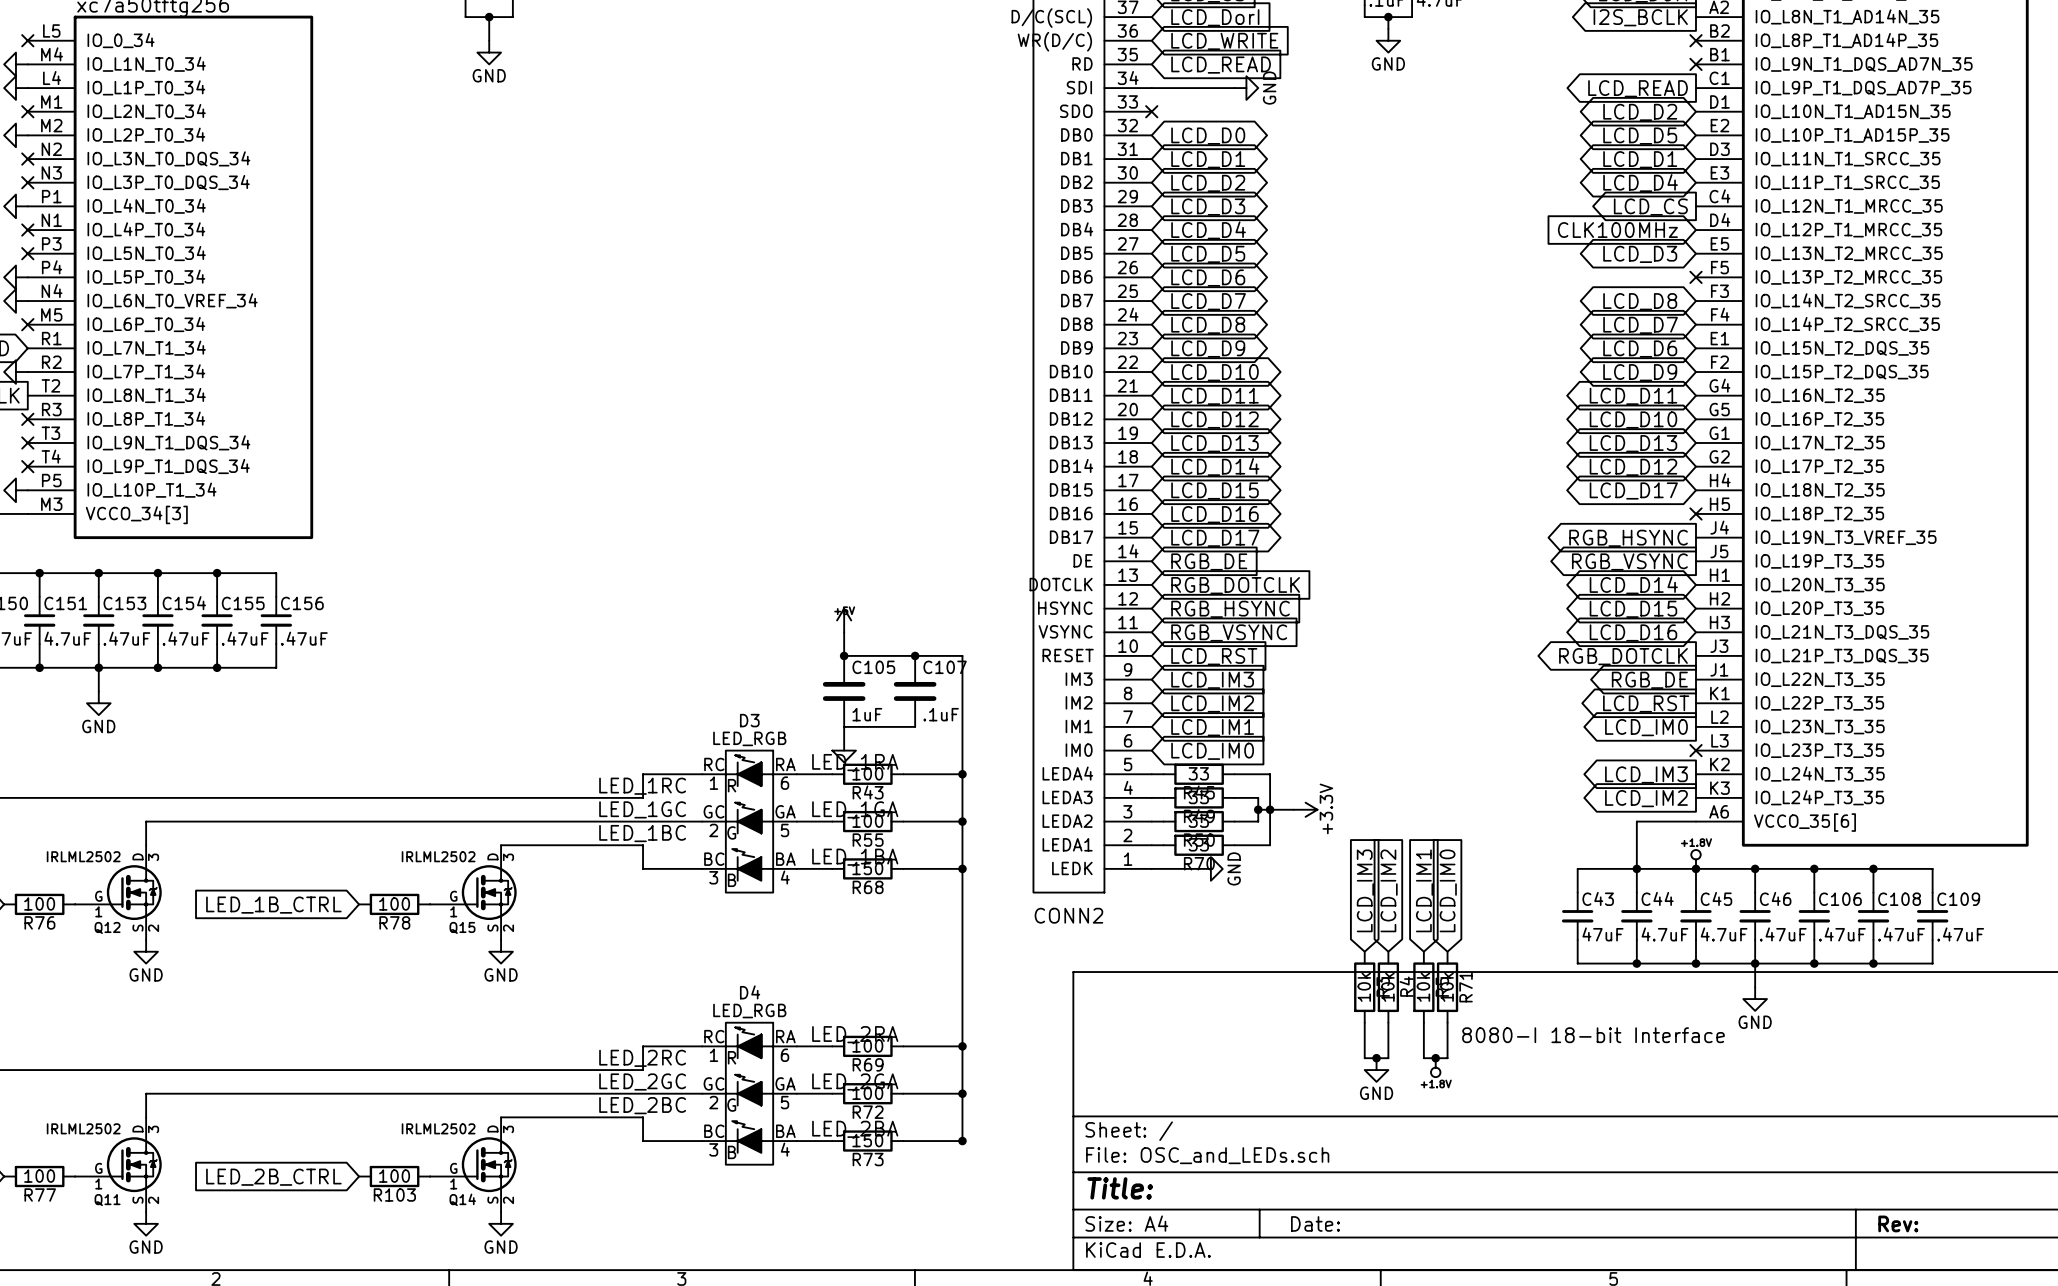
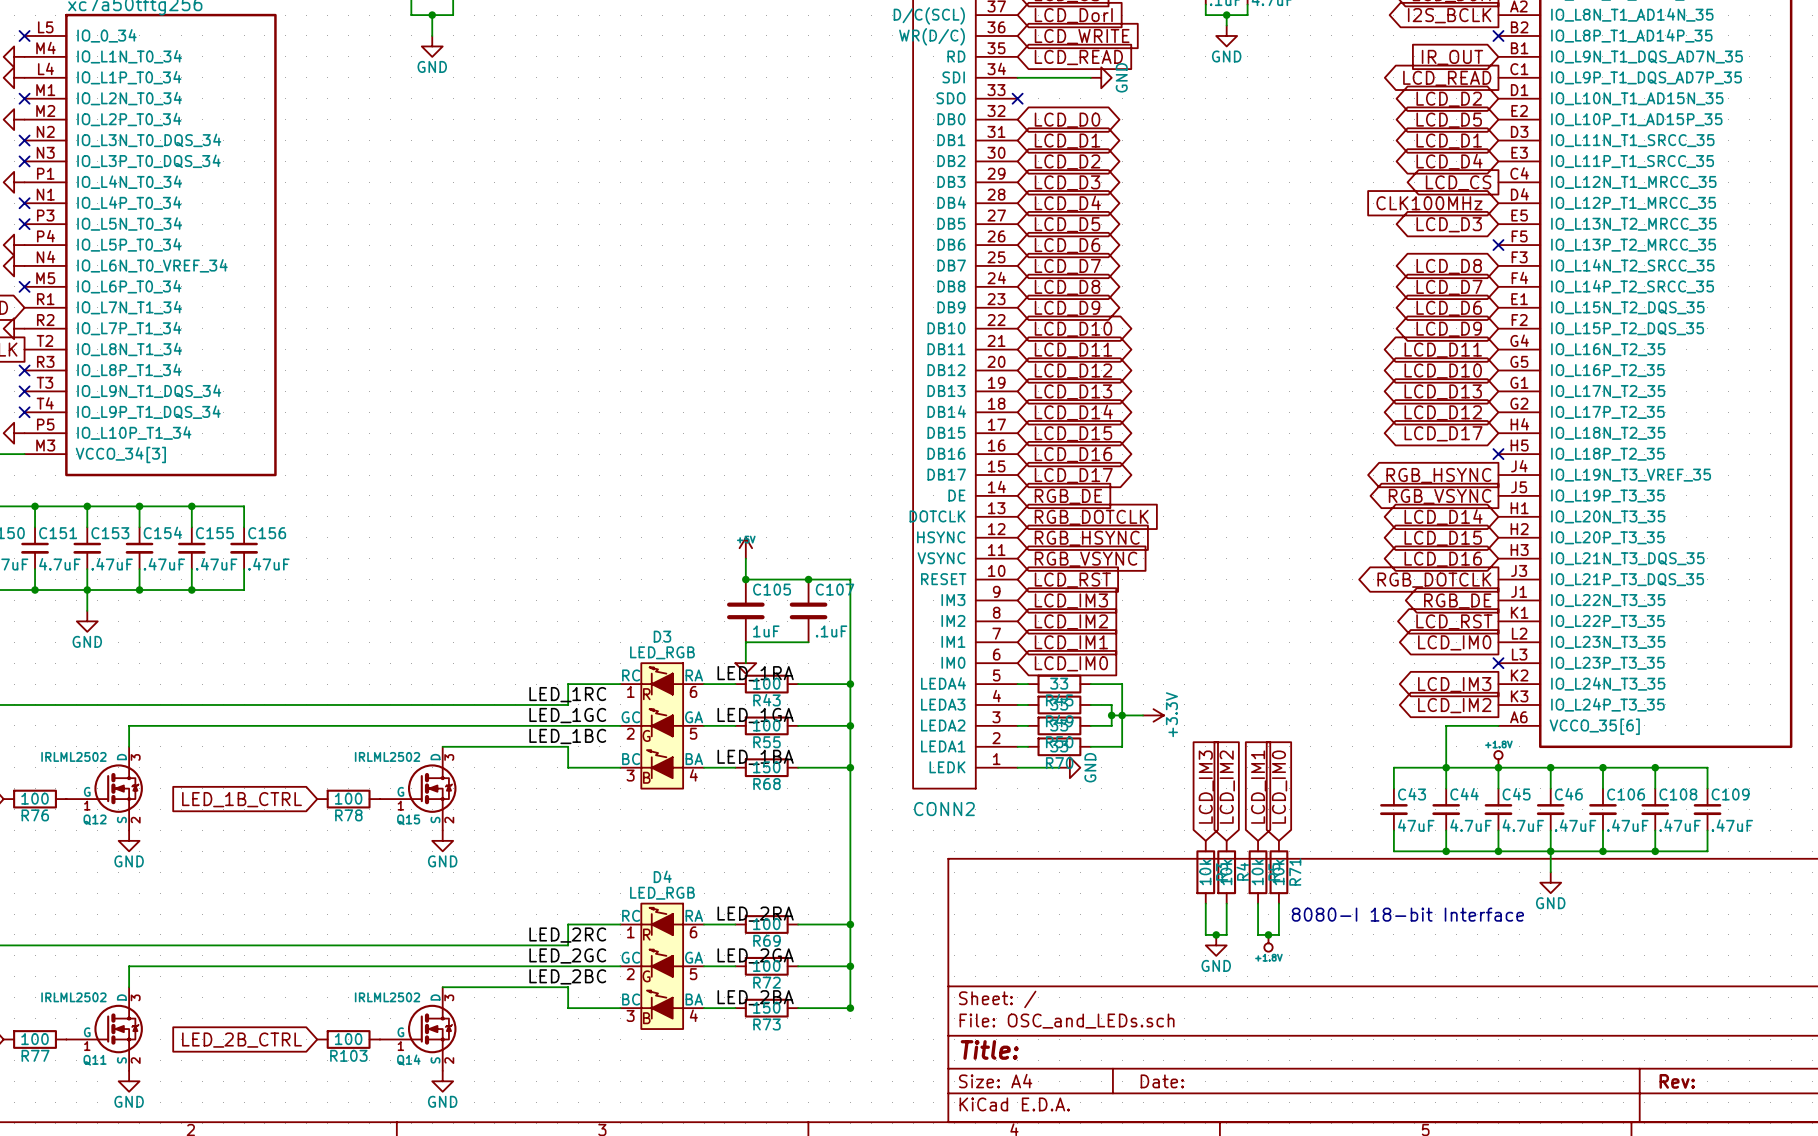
no-connect mark: (1695, 64) -> none
global label: none -> IR_OUT (1452, 57)

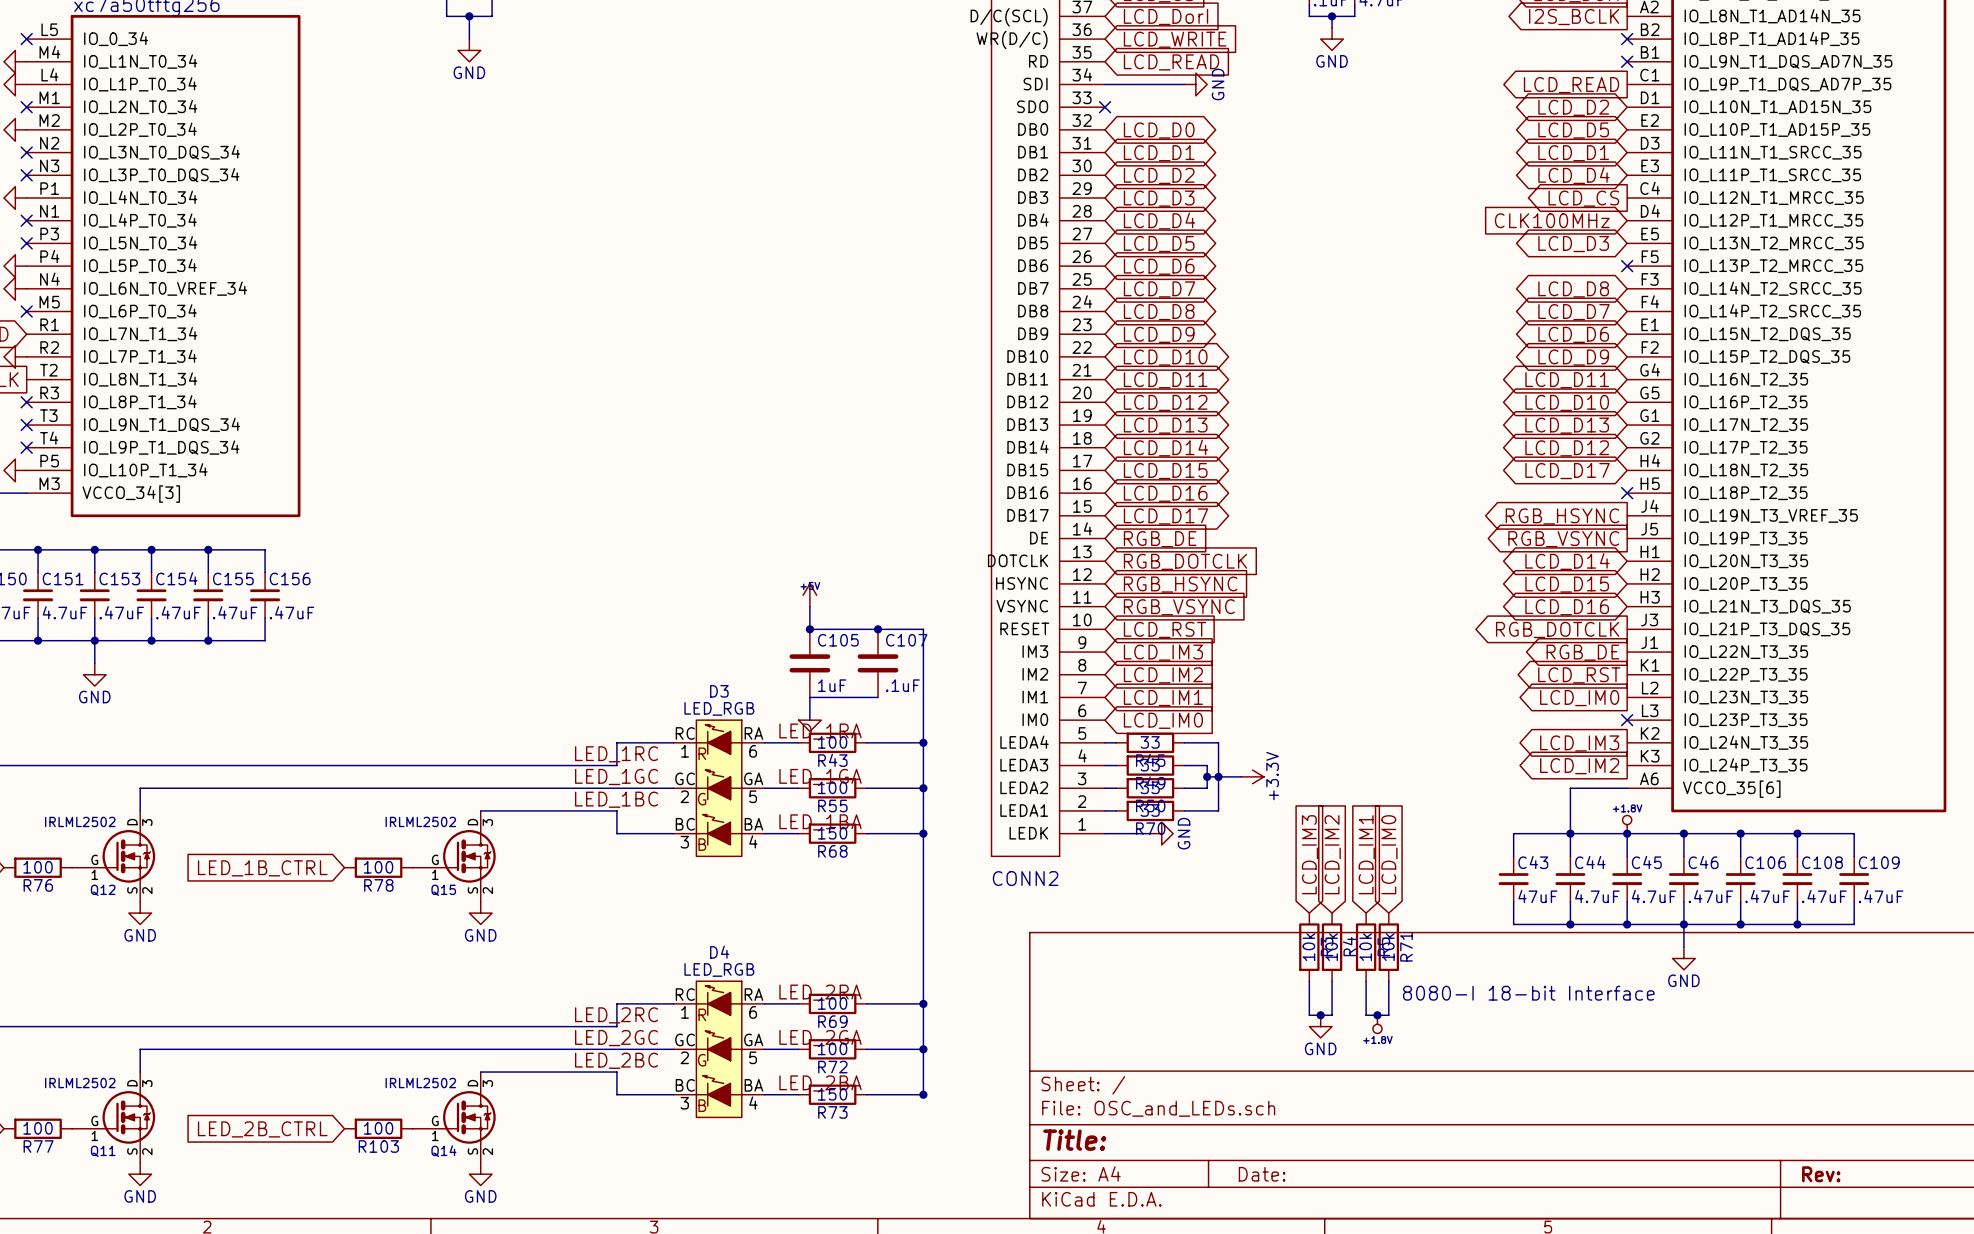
no-connect mark: none -> (1627, 61)
global label: IR_OUT (1452, 57) -> none

